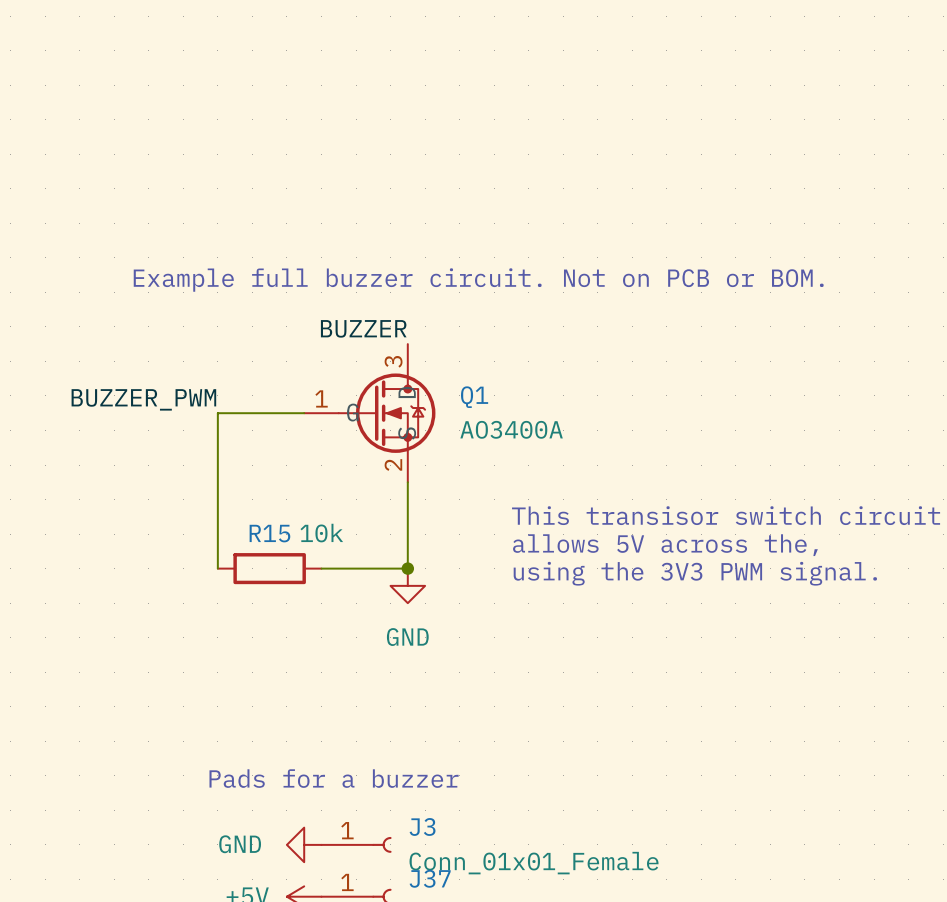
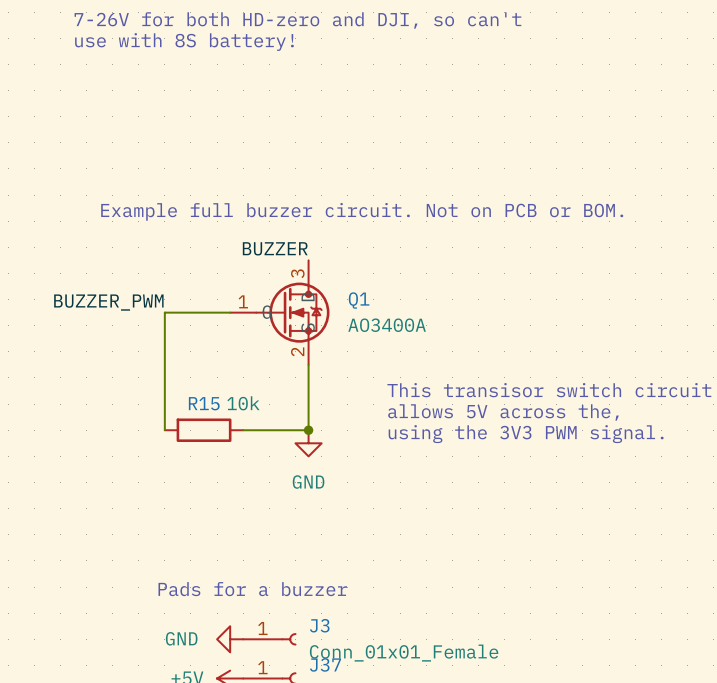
text: none -> 7-26V for both HD-zero and DJI, so can't (297, 20)
text: none -> use with 8S battery! (184, 42)

